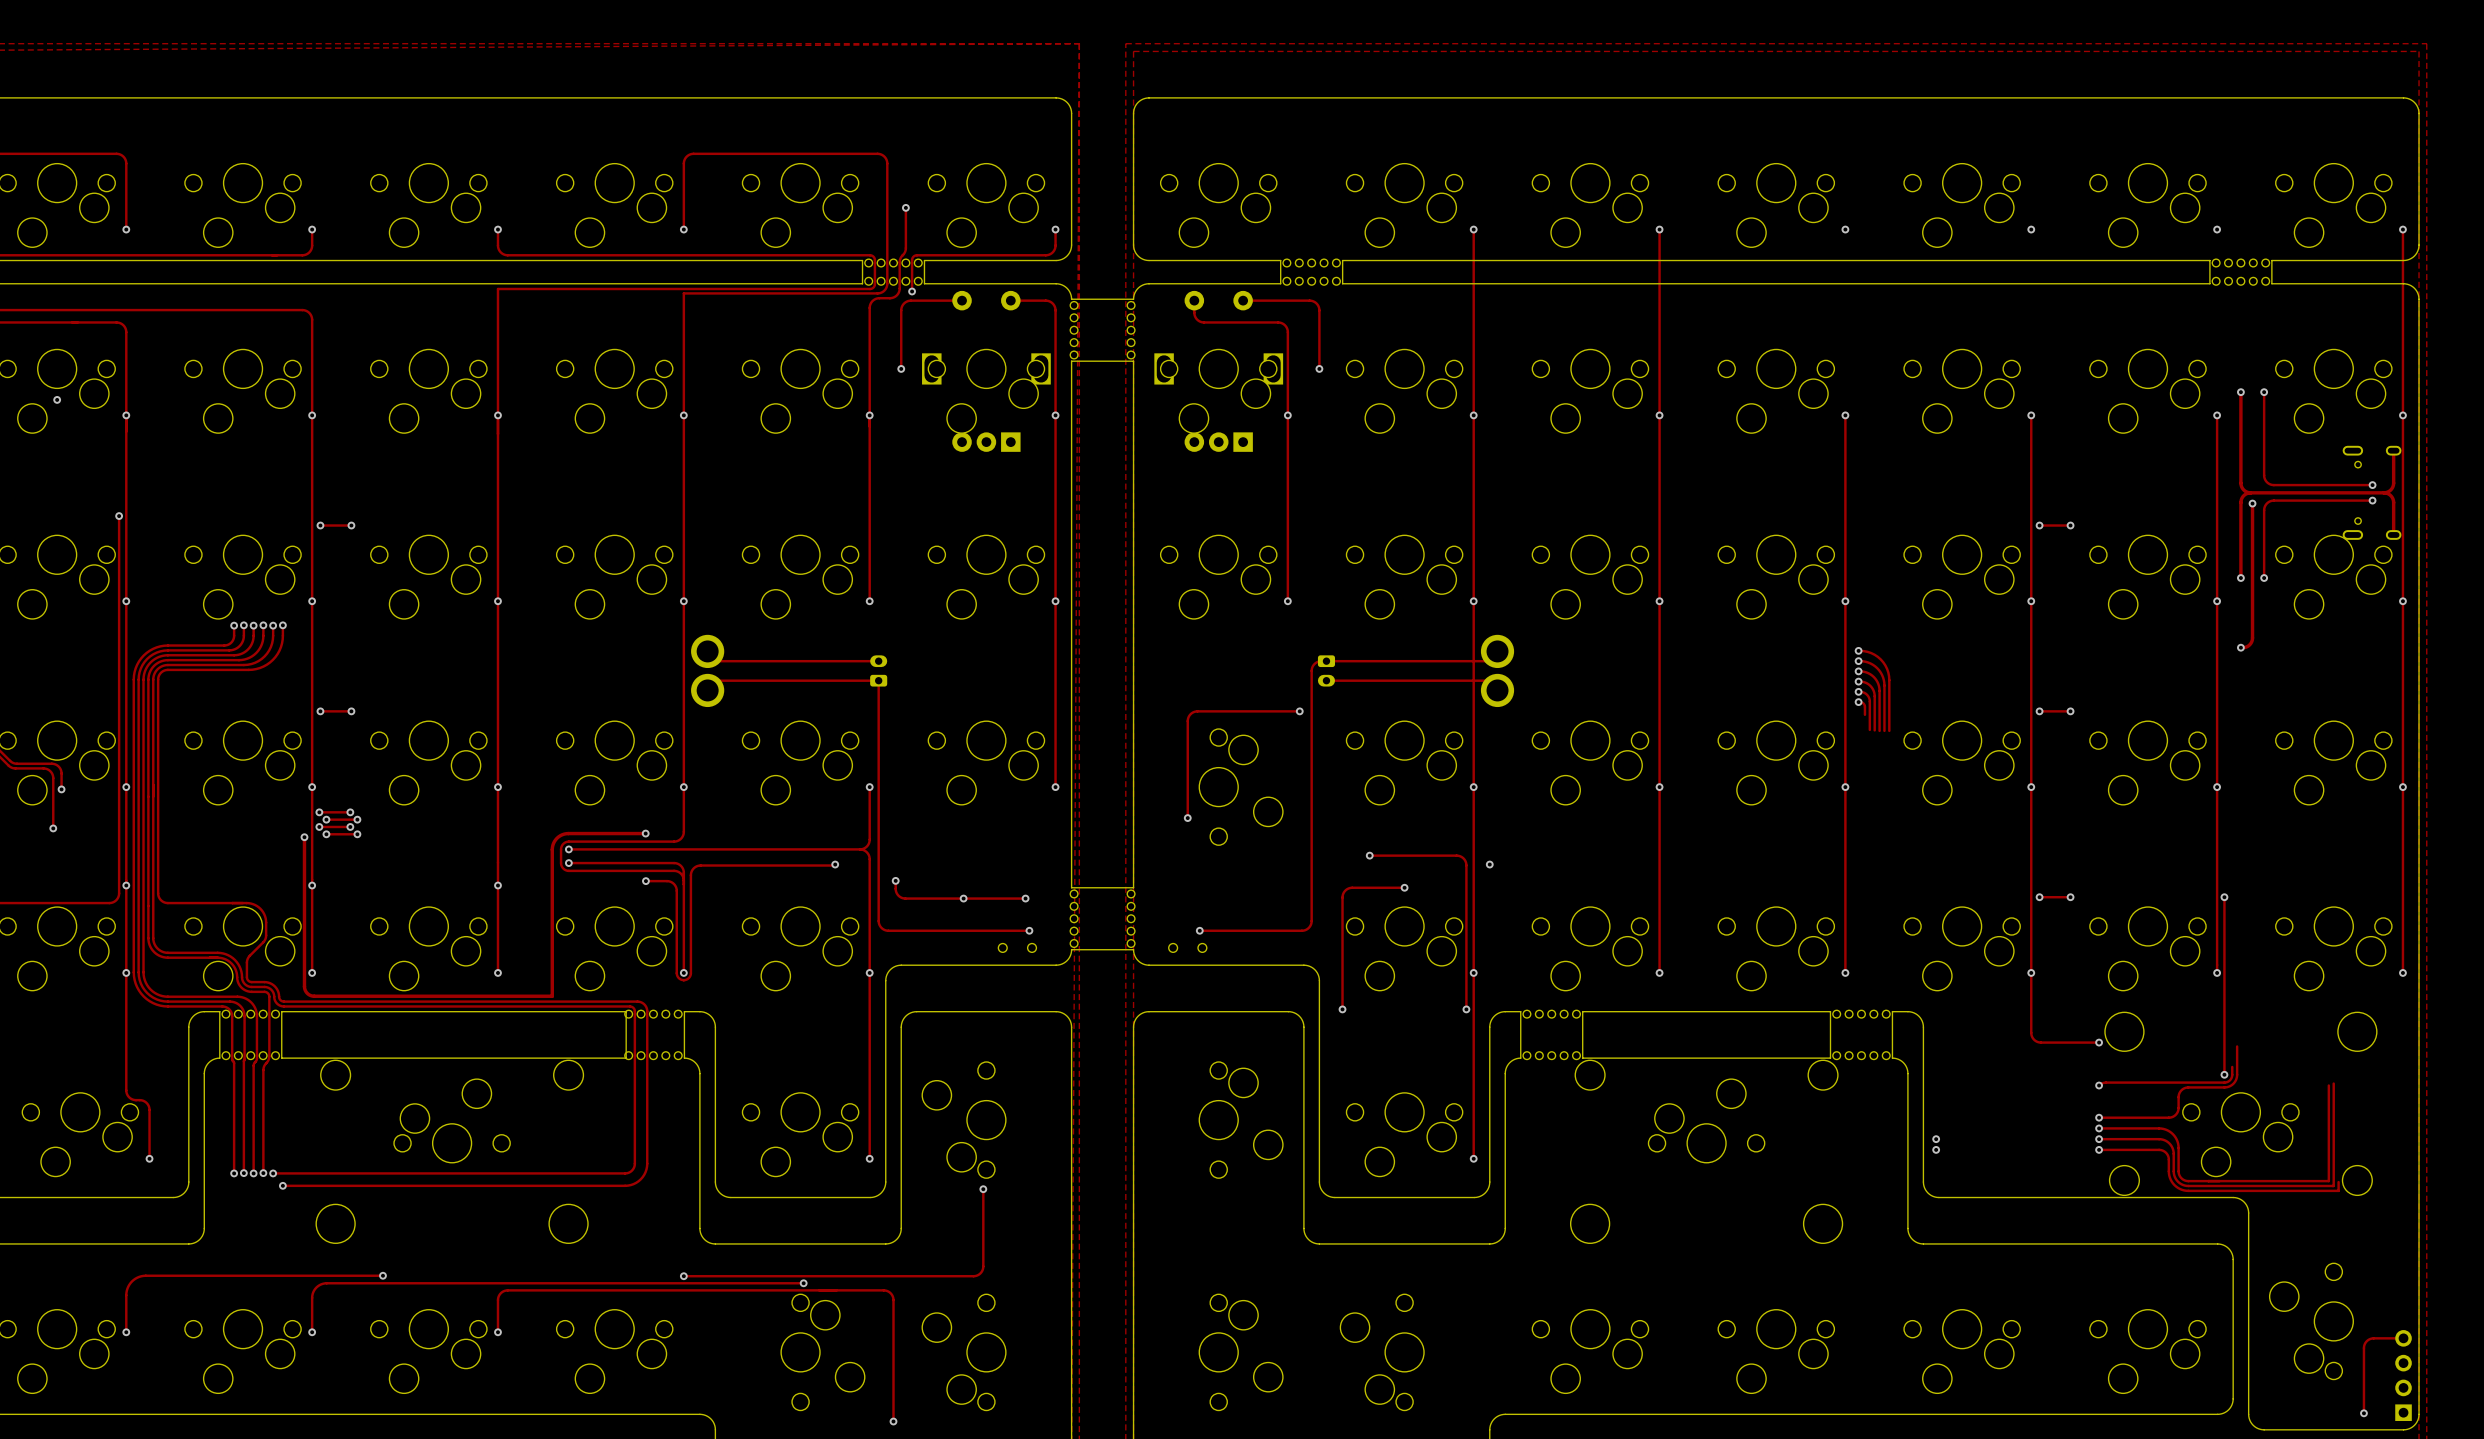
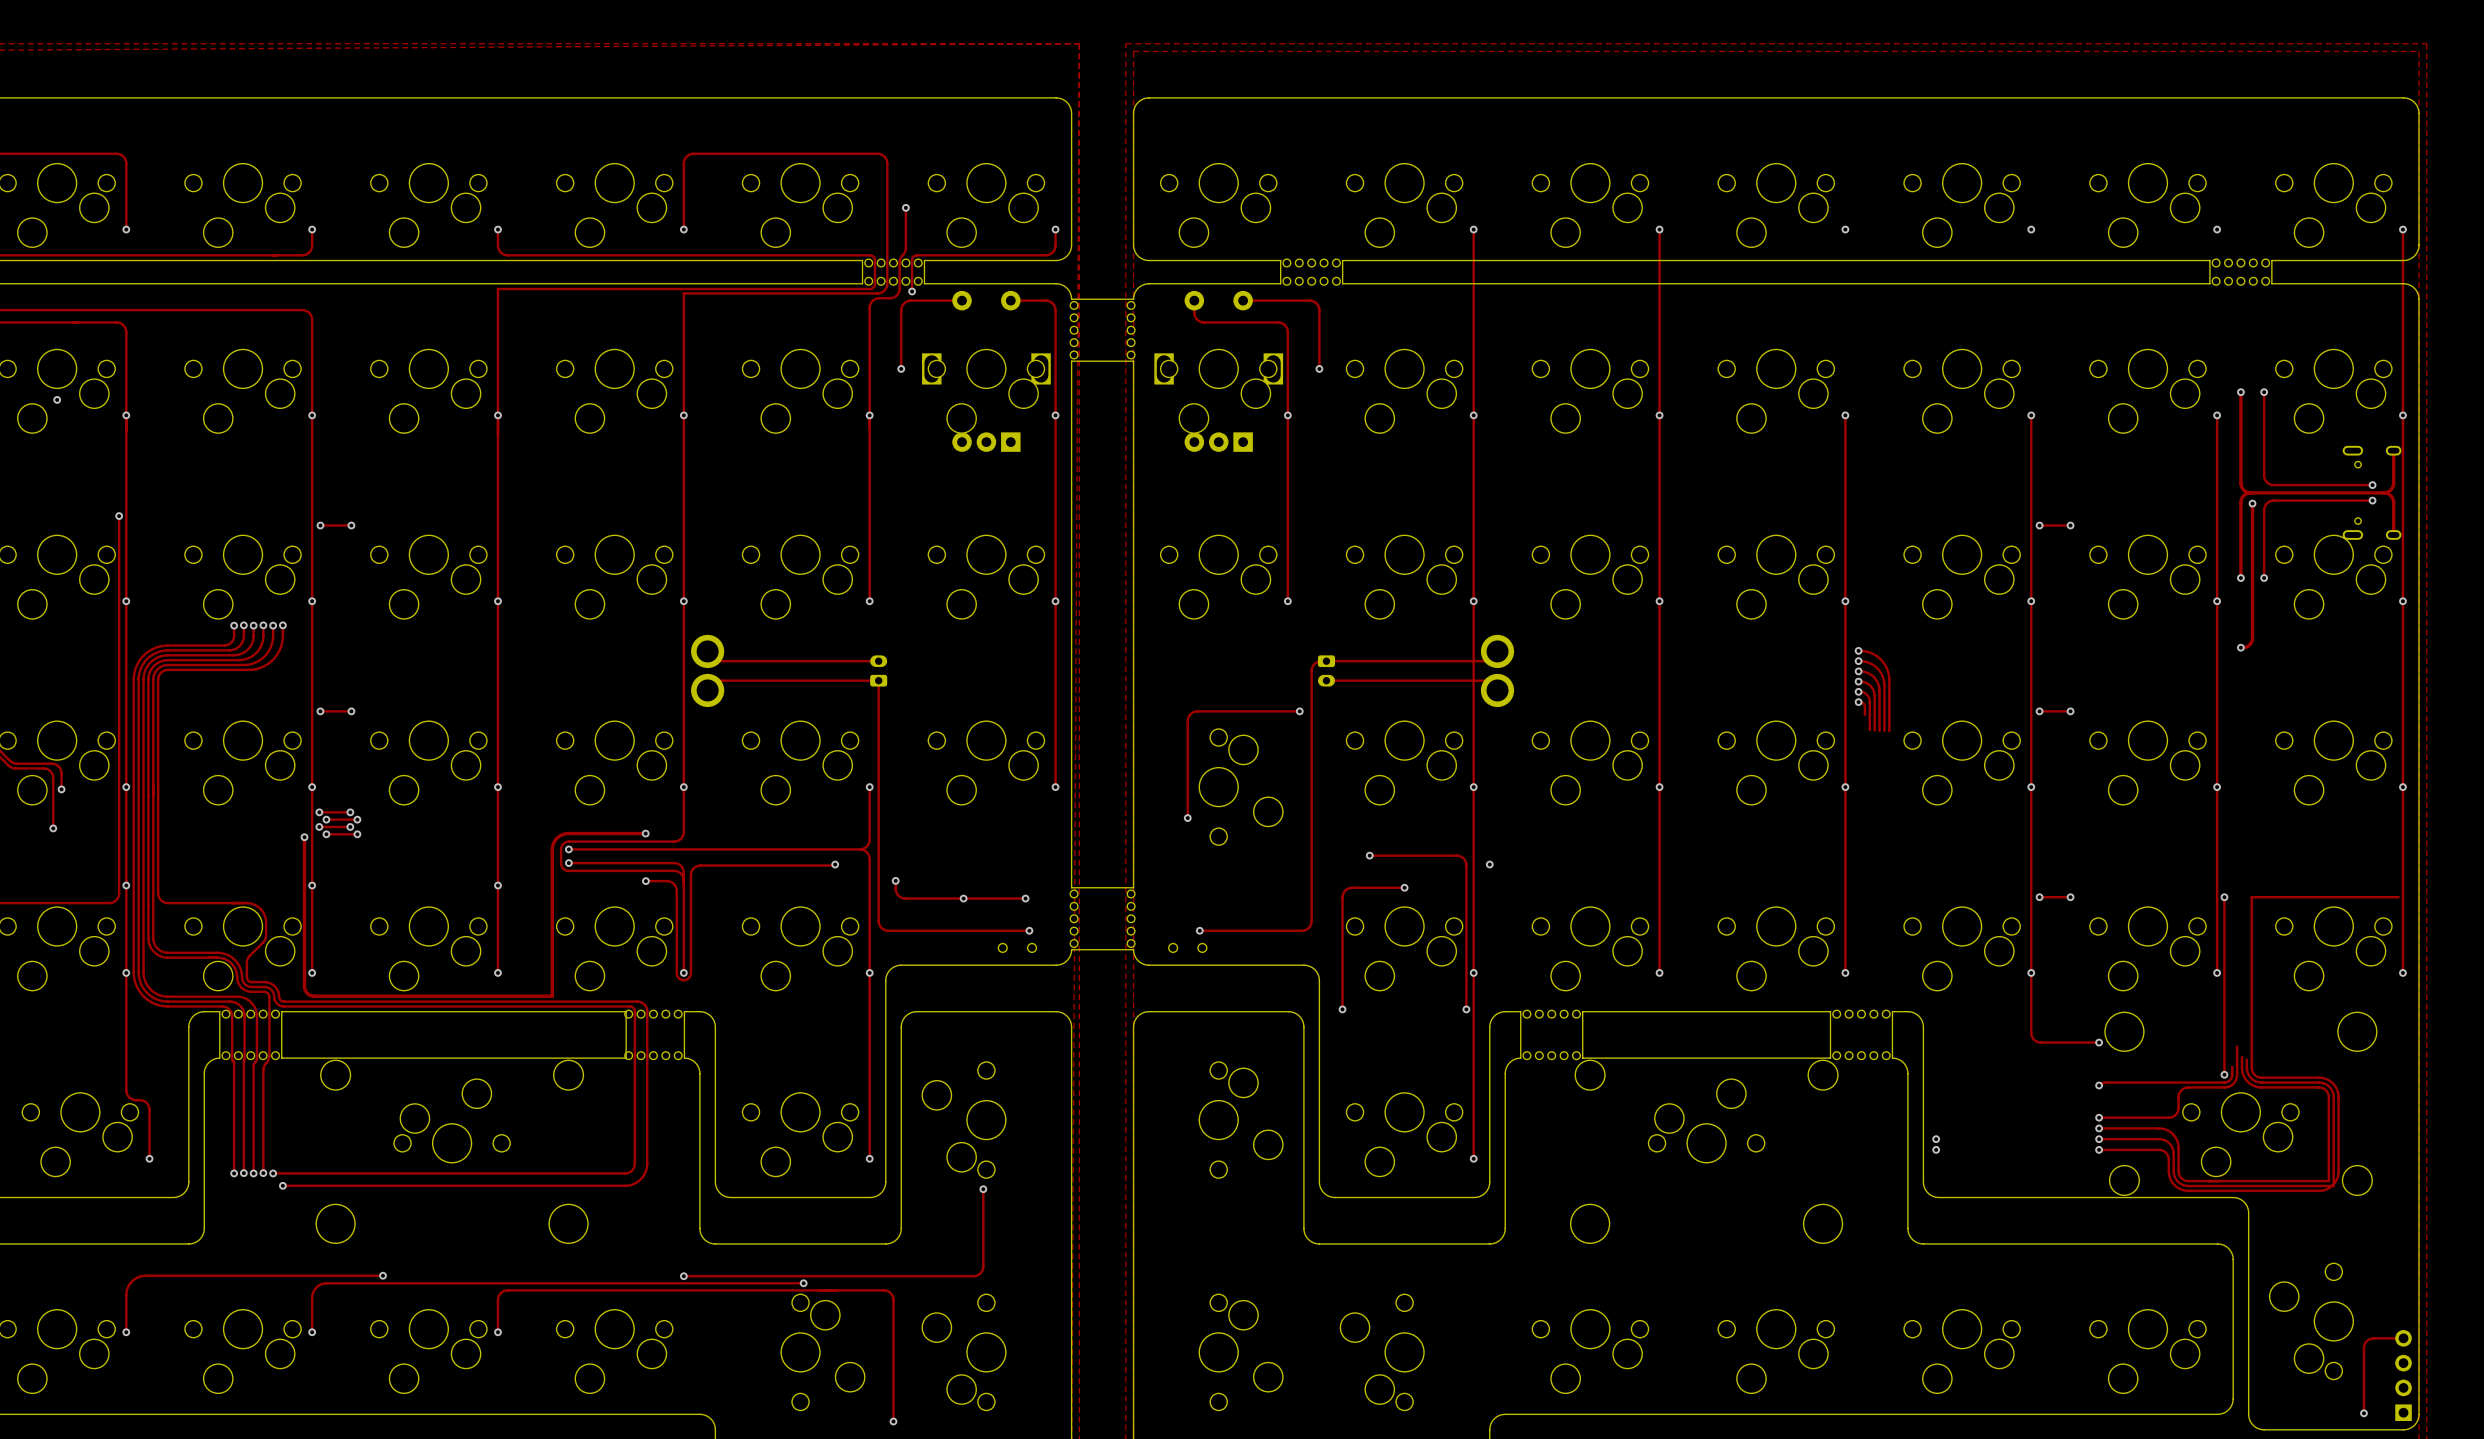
track: (2333, 1083) (2333, 1097) -> (2246, 1059) (2248, 1073) (2255, 1081) (2322, 1083) (2330, 1088) (2333, 1097)
track: (2328, 1085) (2328, 1097) -> (2242, 1057) (2243, 1074) (2253, 1085) (2261, 1087) (2320, 1087) (2325, 1090) (2328, 1097)
track: (2338, 1182) (2338, 1190) (2319, 1190) -> (2398, 897) (2251, 897) (2252, 1072) (2260, 1077) (2323, 1078) (2332, 1083) (2338, 1092) (2338, 1175) (2331, 1186) (2319, 1190)

